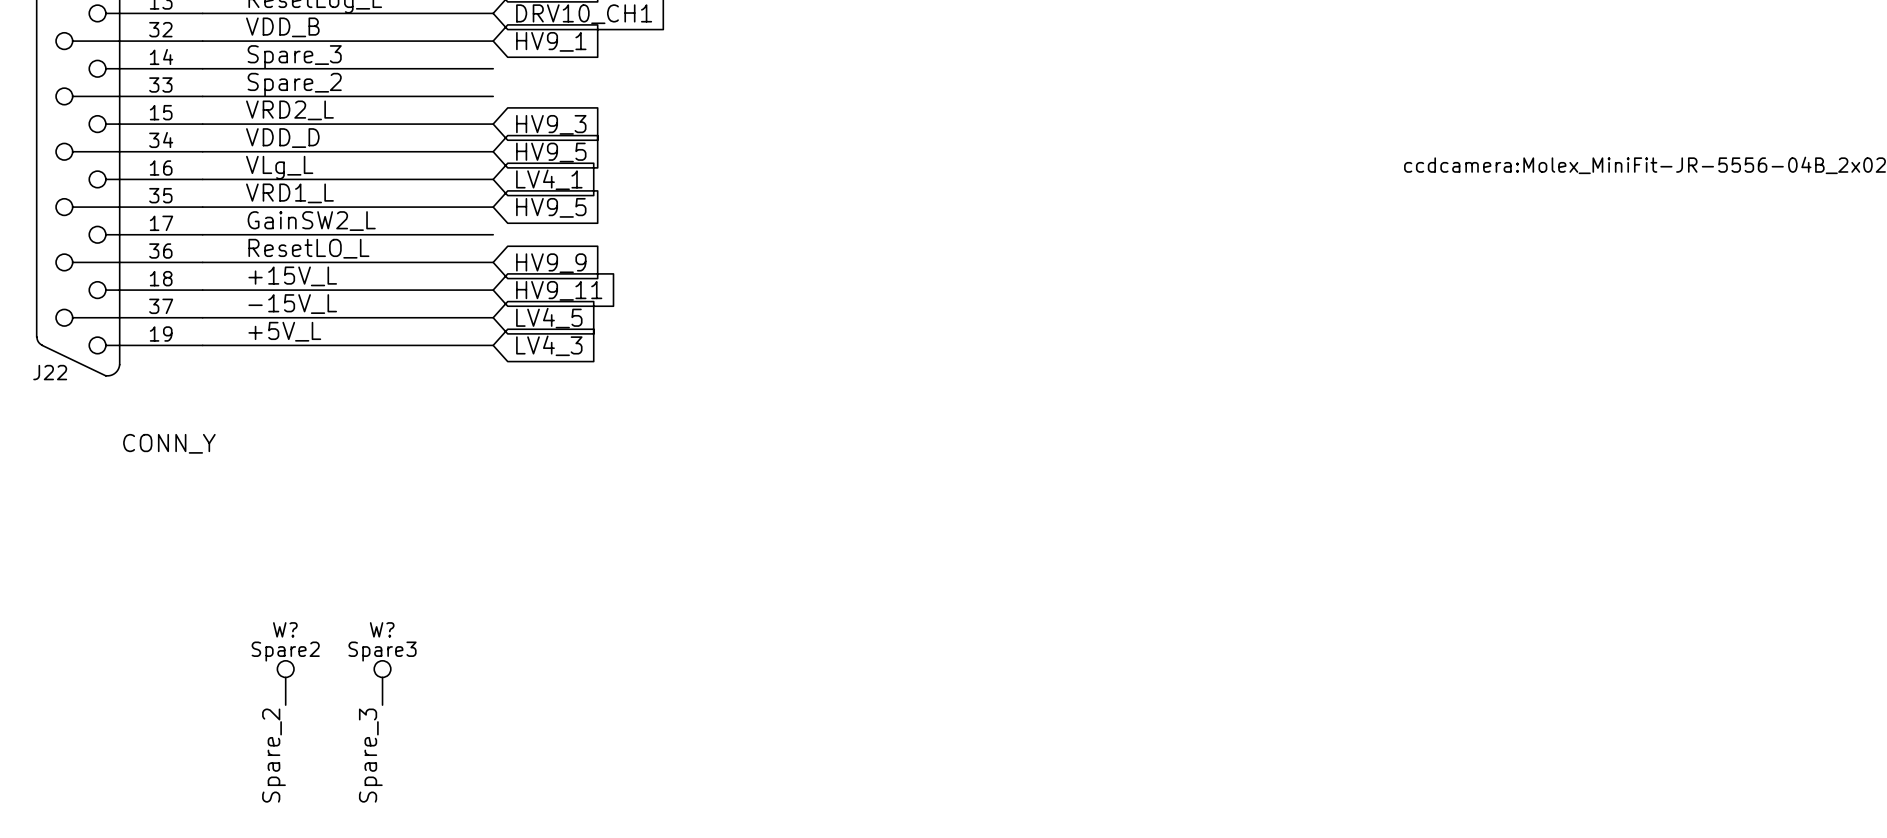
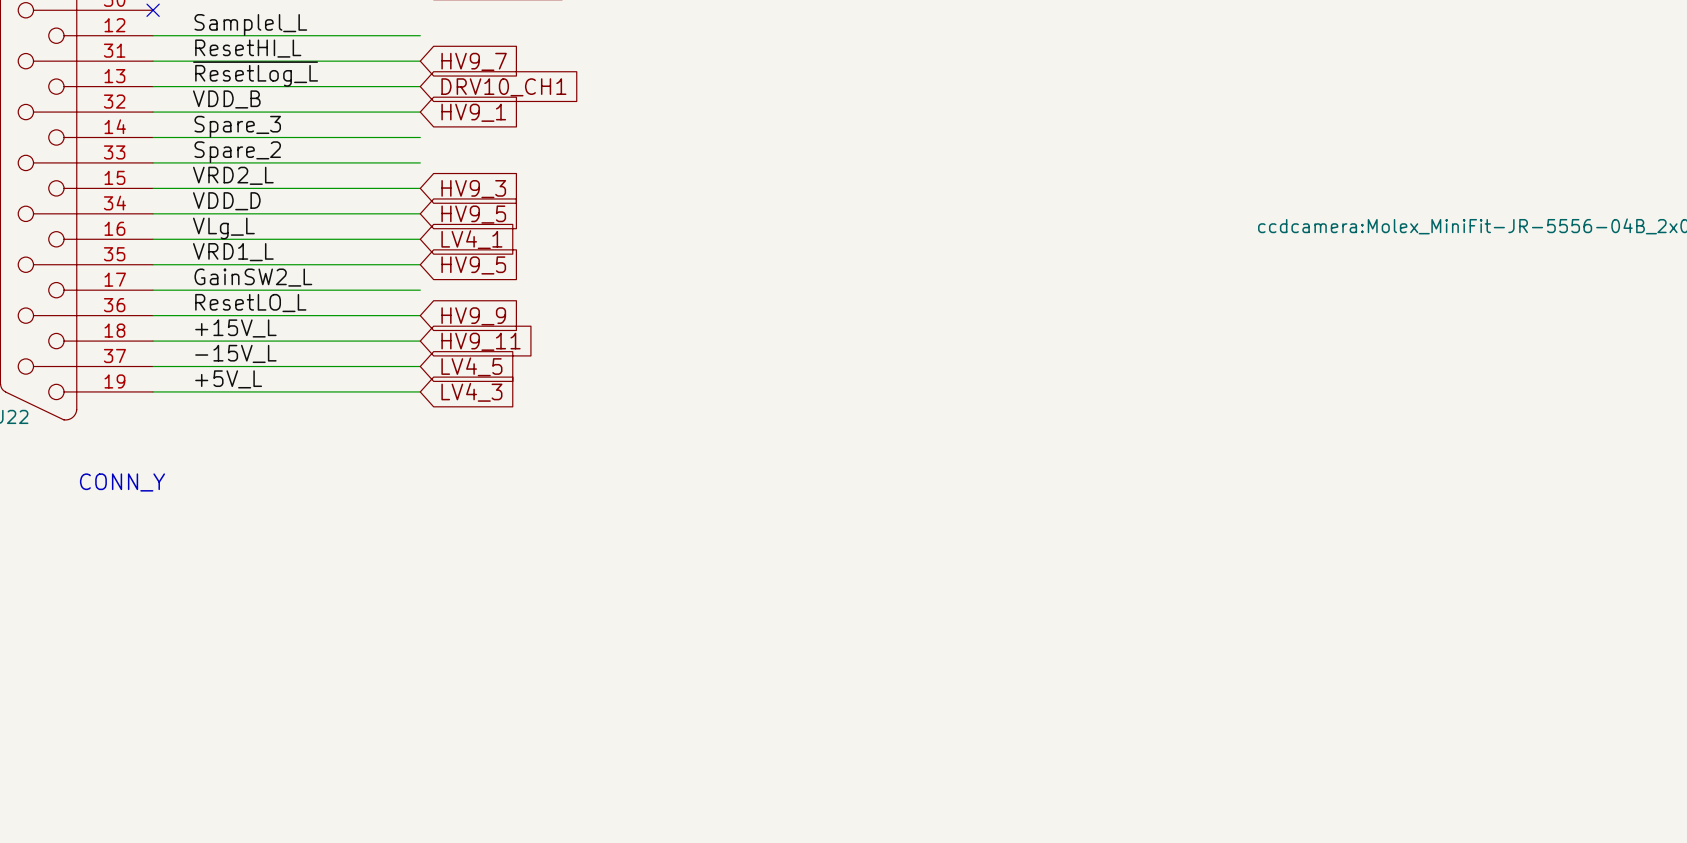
W?: Spare2 (285, 682) -> none
W?: Spare3 (382, 682) -> none
label: Spare_2 (273, 755) -> none
label: Spare_3 (370, 755) -> none

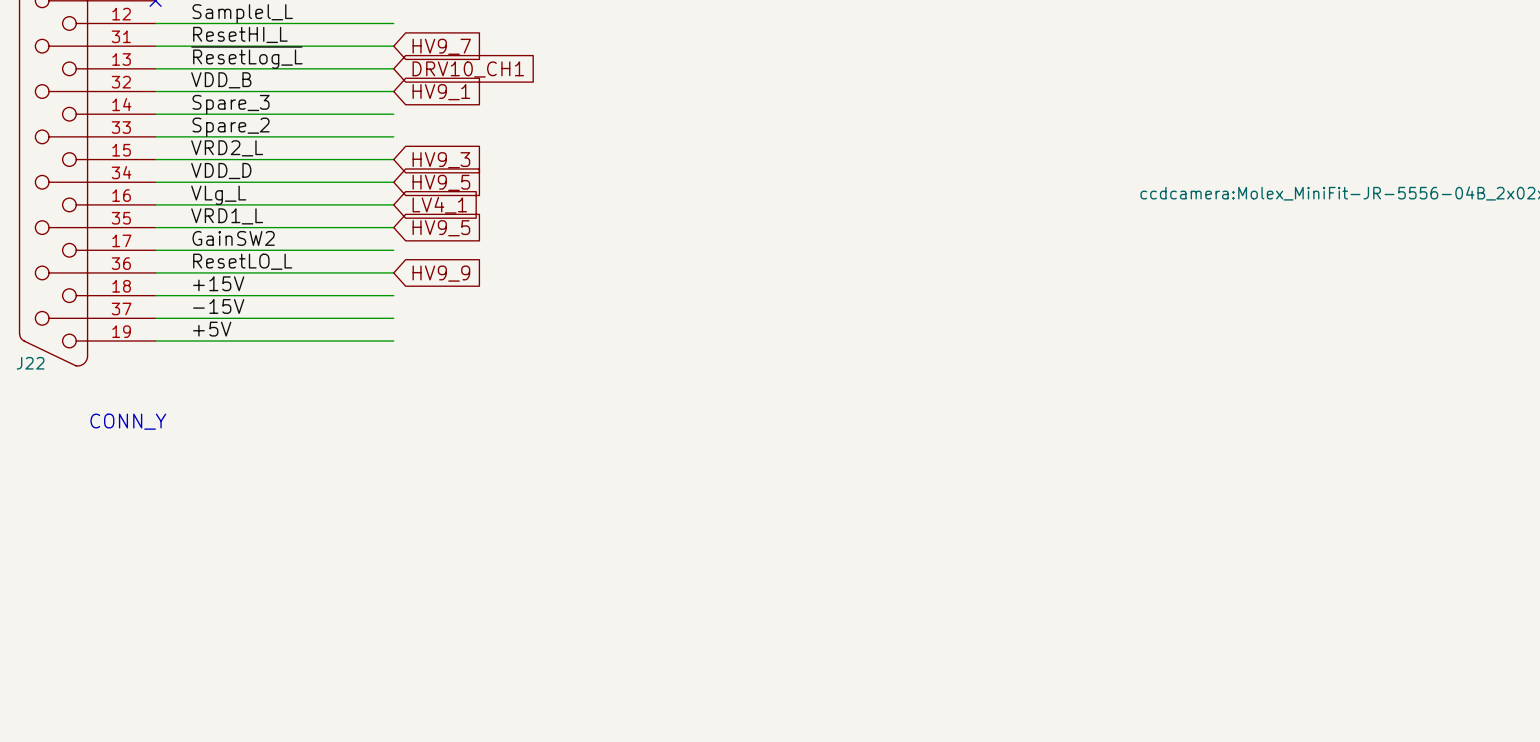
label: GainSW2_L (253, 277) -> GainSW2 (233, 238)
label: +15V_L (235, 328) -> +15V (218, 283)
global label: HV9_11 (481, 341) -> none
label: -15V_L (235, 353) -> -15V (218, 306)
global label: LV4_5 (471, 366) -> none
label: +5V_L (228, 379) -> +5V (212, 329)
global label: LV4_3 (471, 392) -> none

